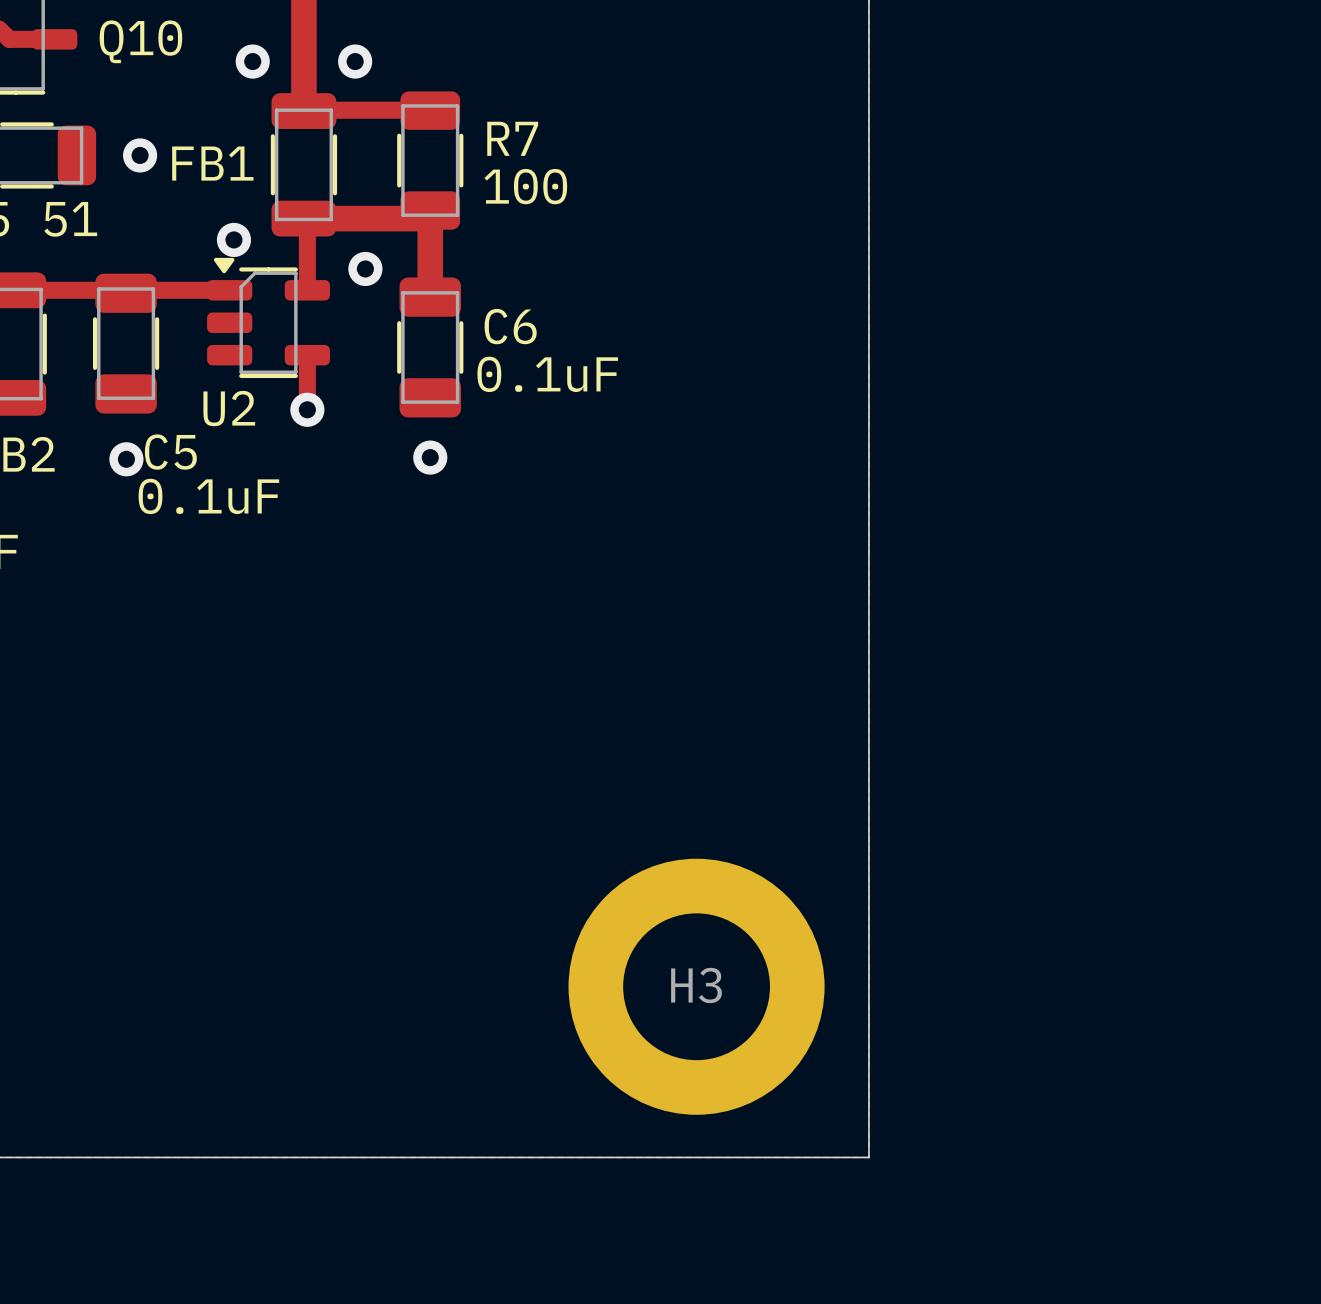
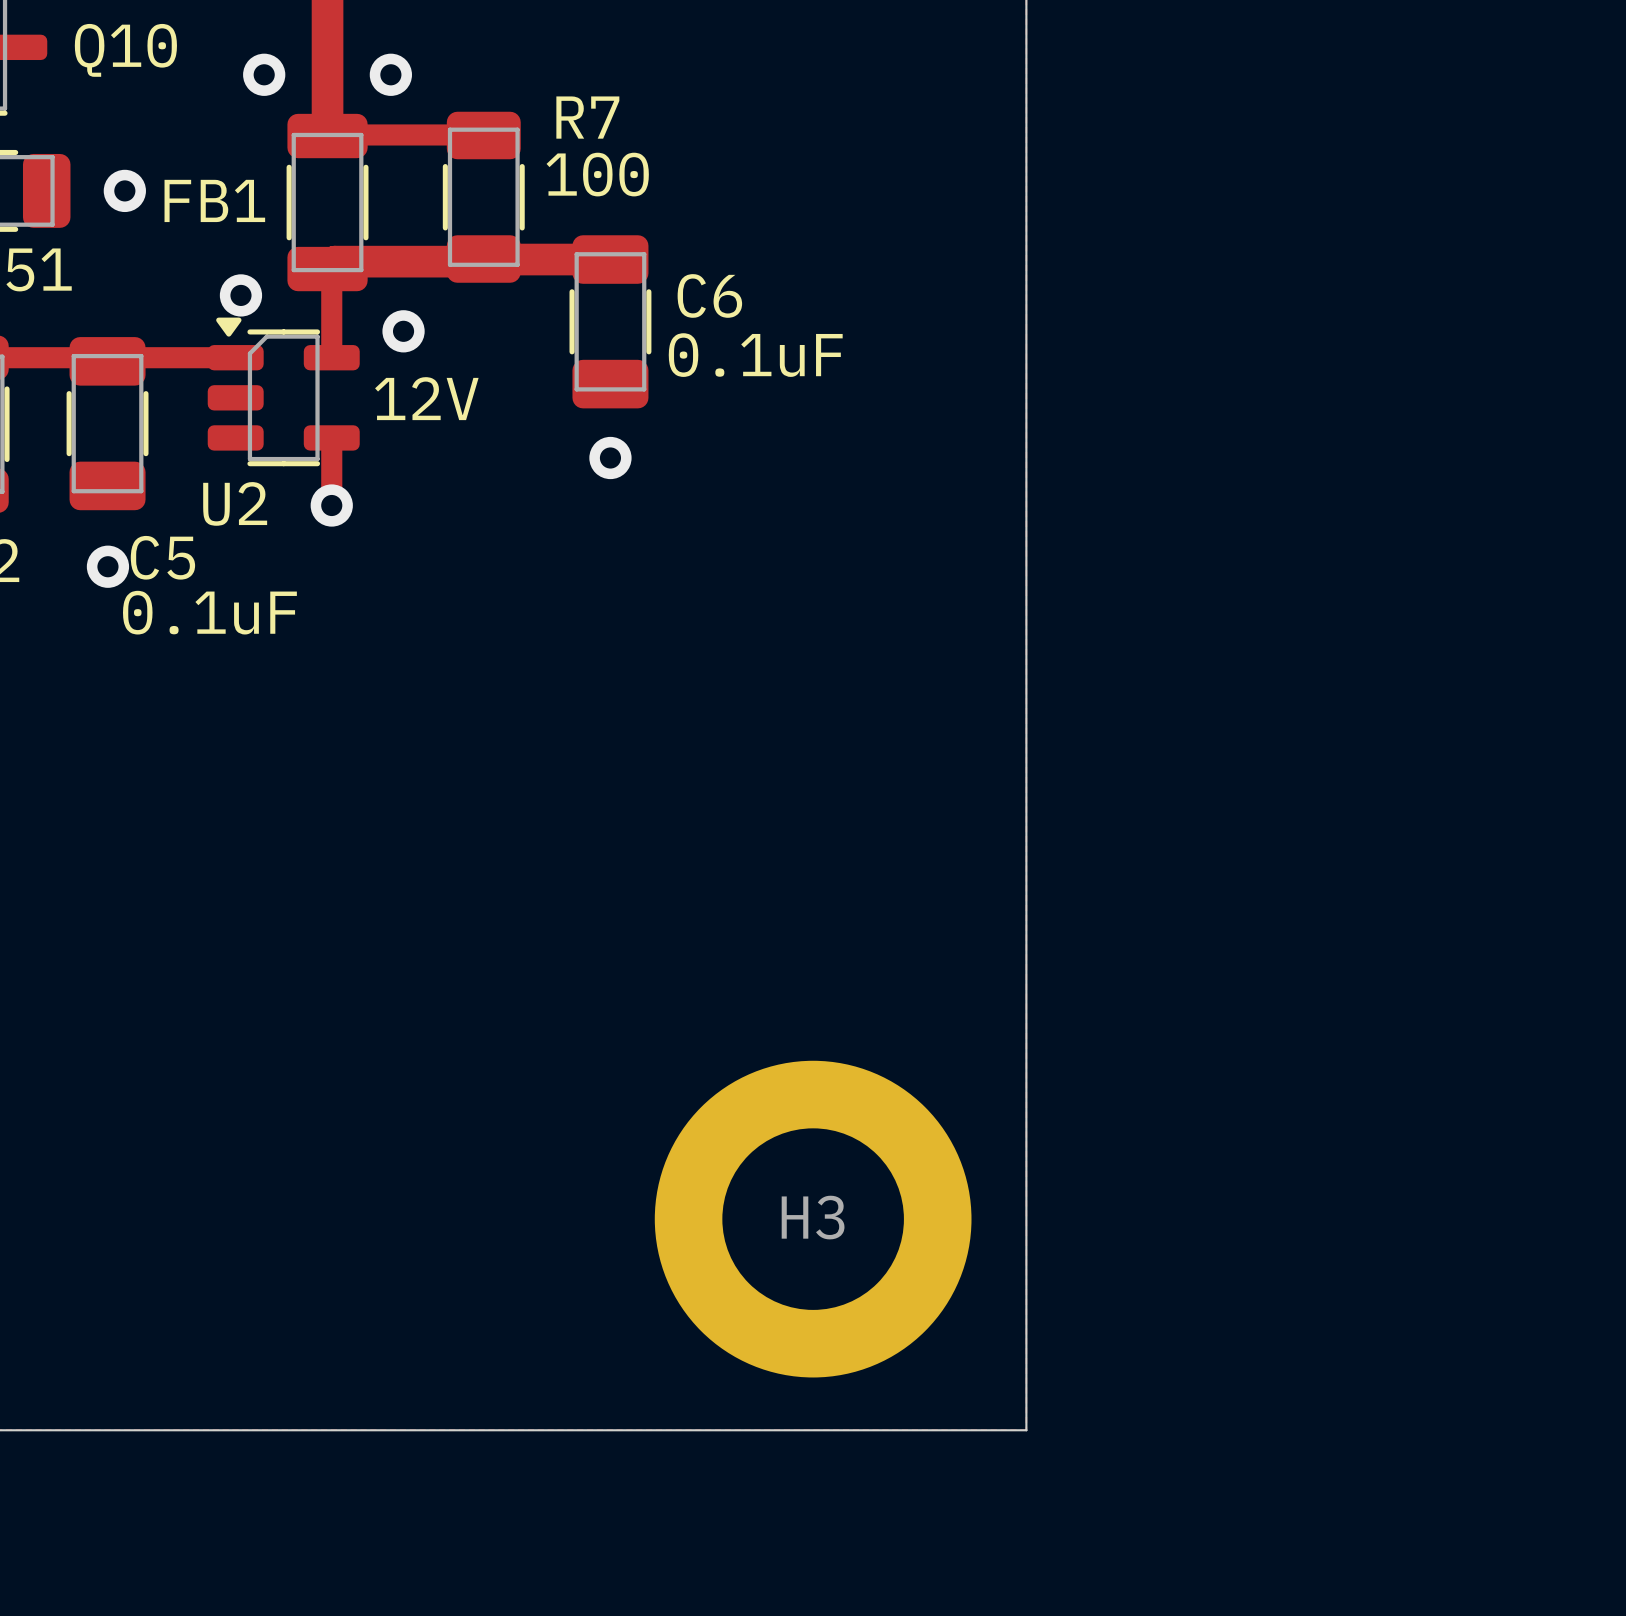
R7 name position: R7 (512, 138) -> R7 (587, 117)
R7 value position: 100 (525, 186) -> 100 (597, 174)
track: (303, 218) (422, 218) (430, 210) (430, 297) -> (327, 269) (334, 261) (610, 259)
text: none -> 12V (426, 398)
C6 position: (430, 347) -> (610, 321)
via position: (430, 457) -> (610, 458)

